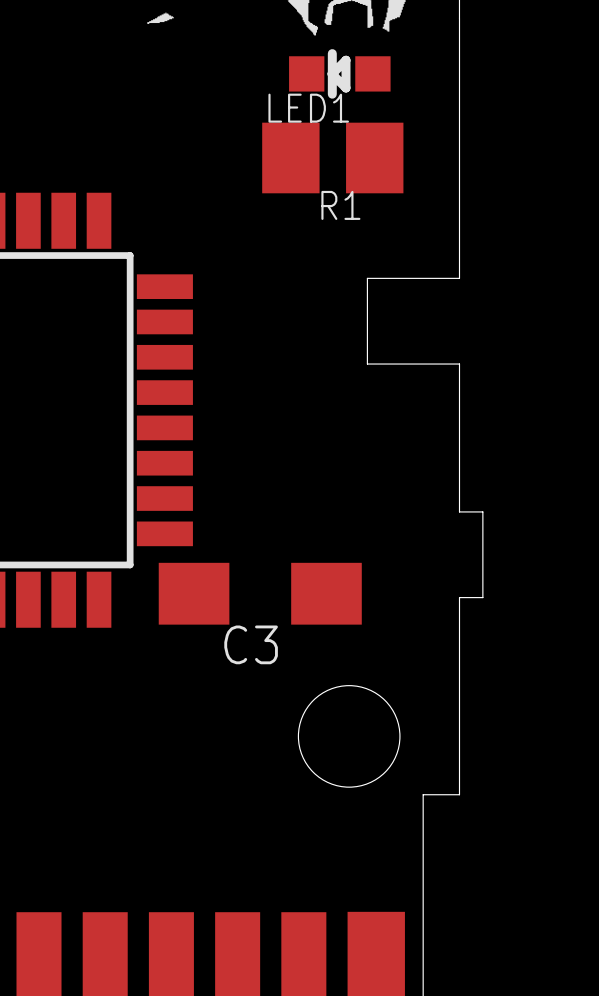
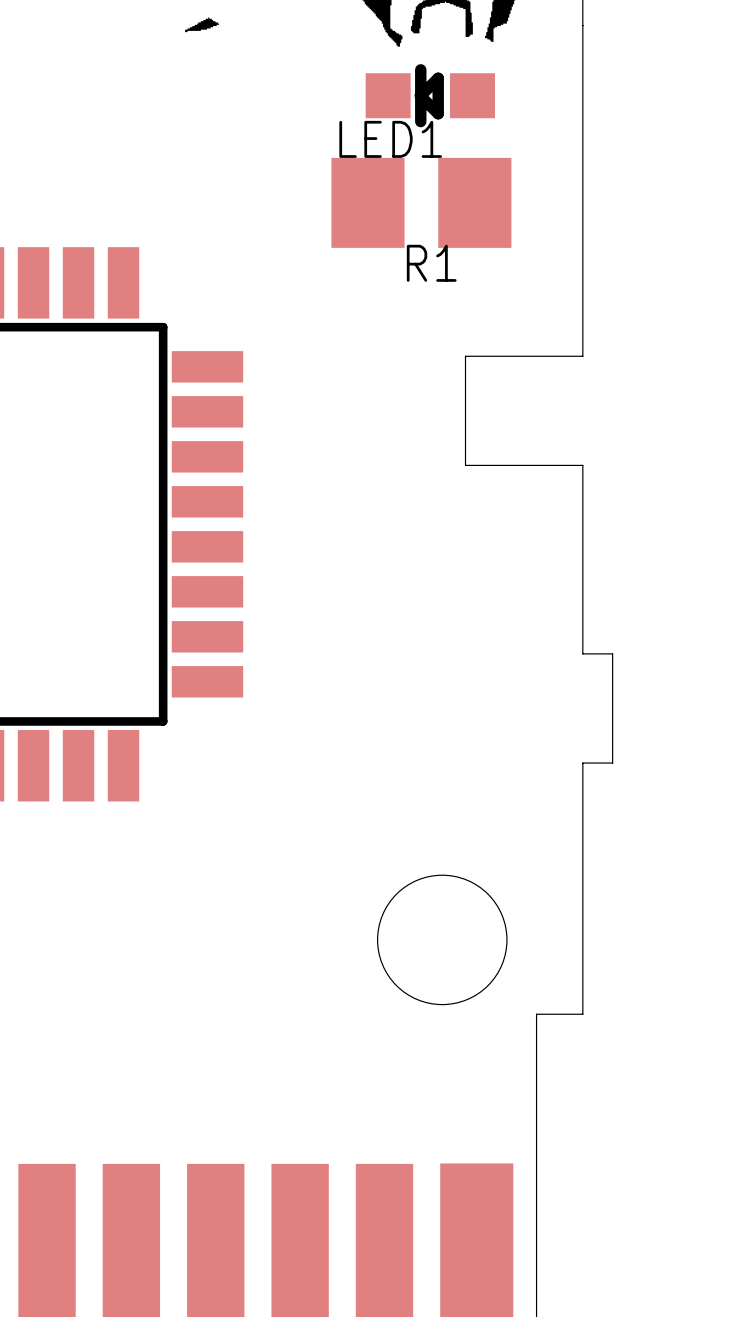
C3: (260, 593) -> none

